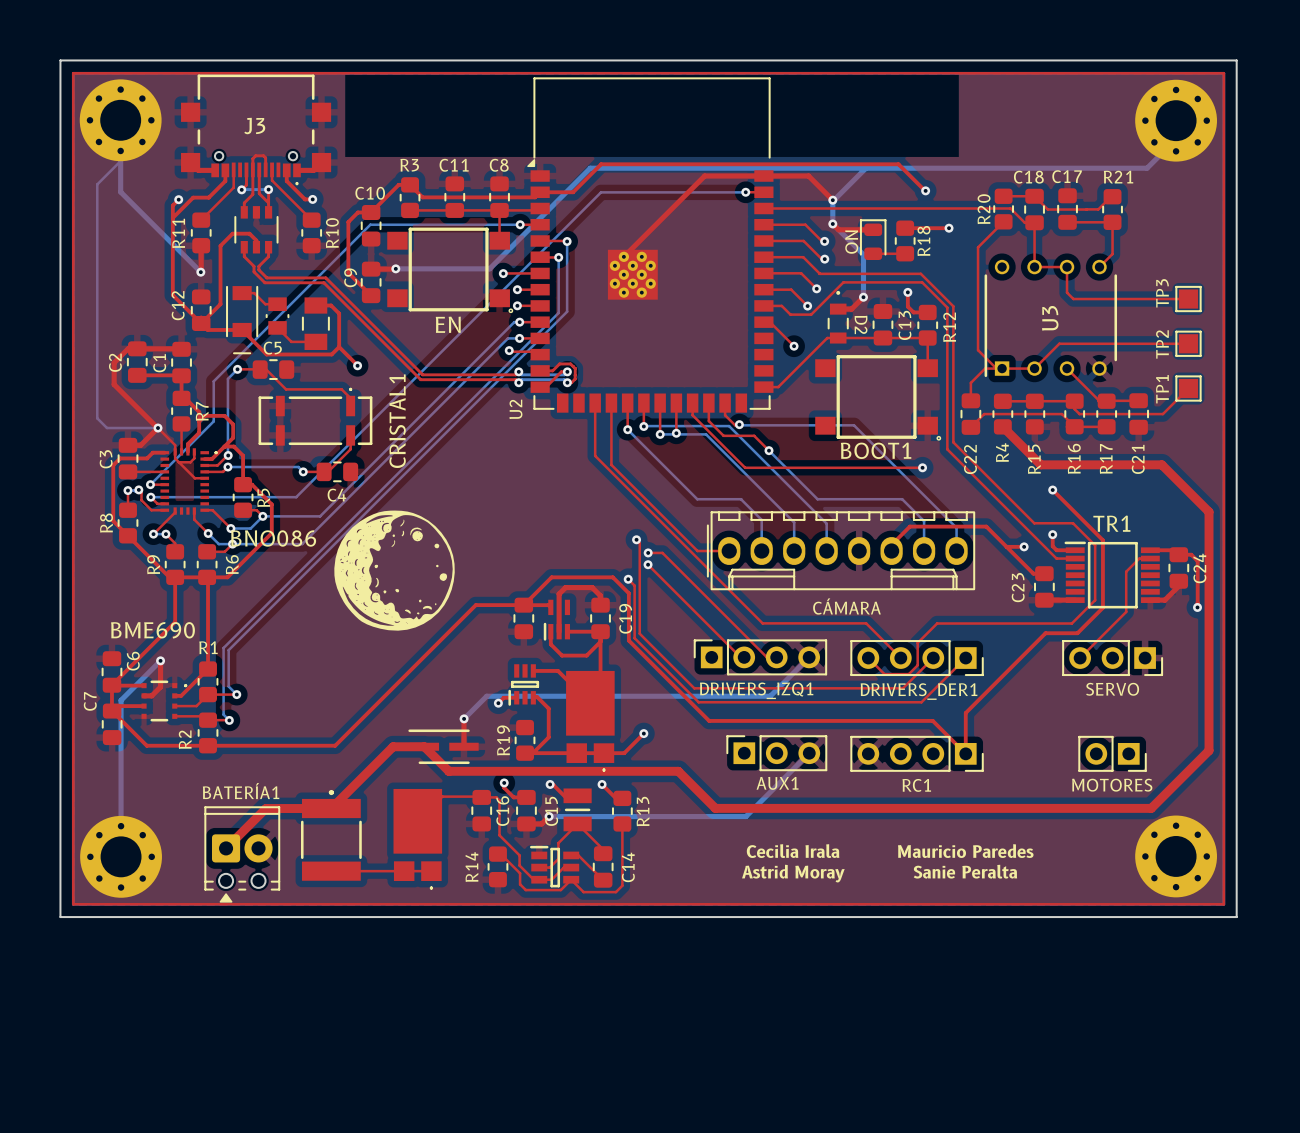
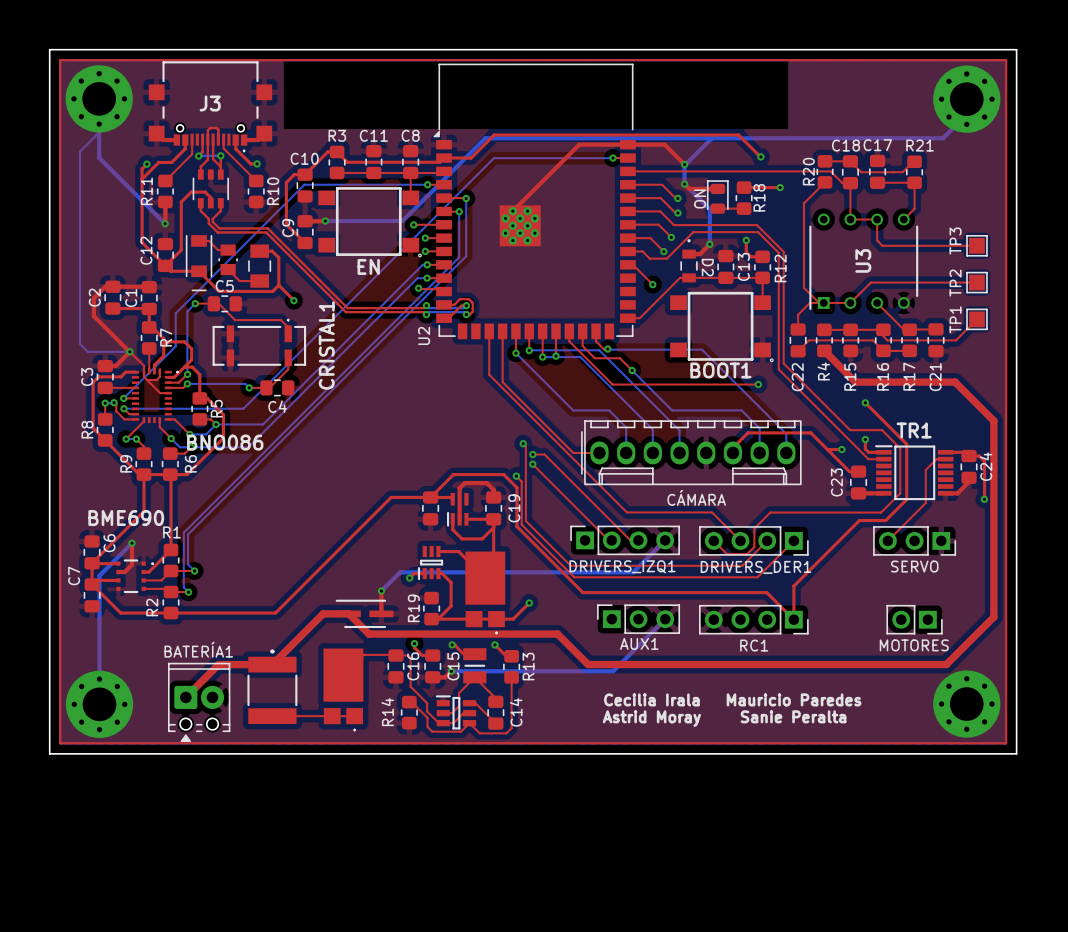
drawing: [334, 510, 455, 631] -> none

